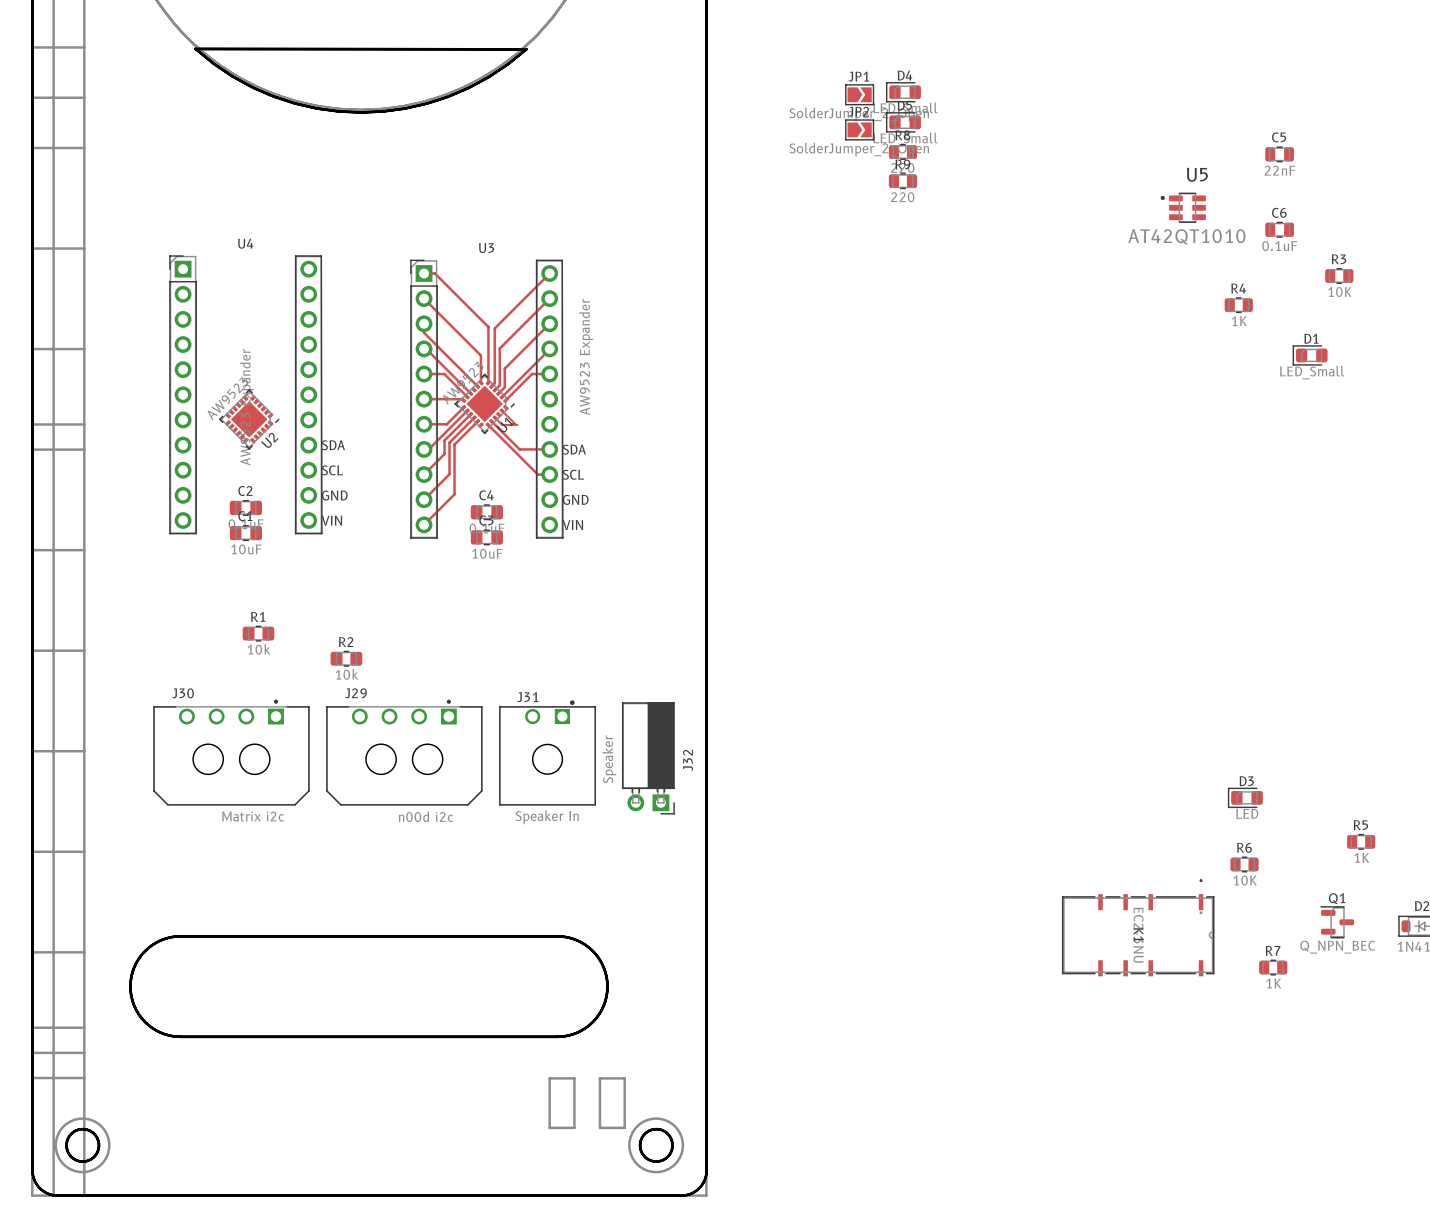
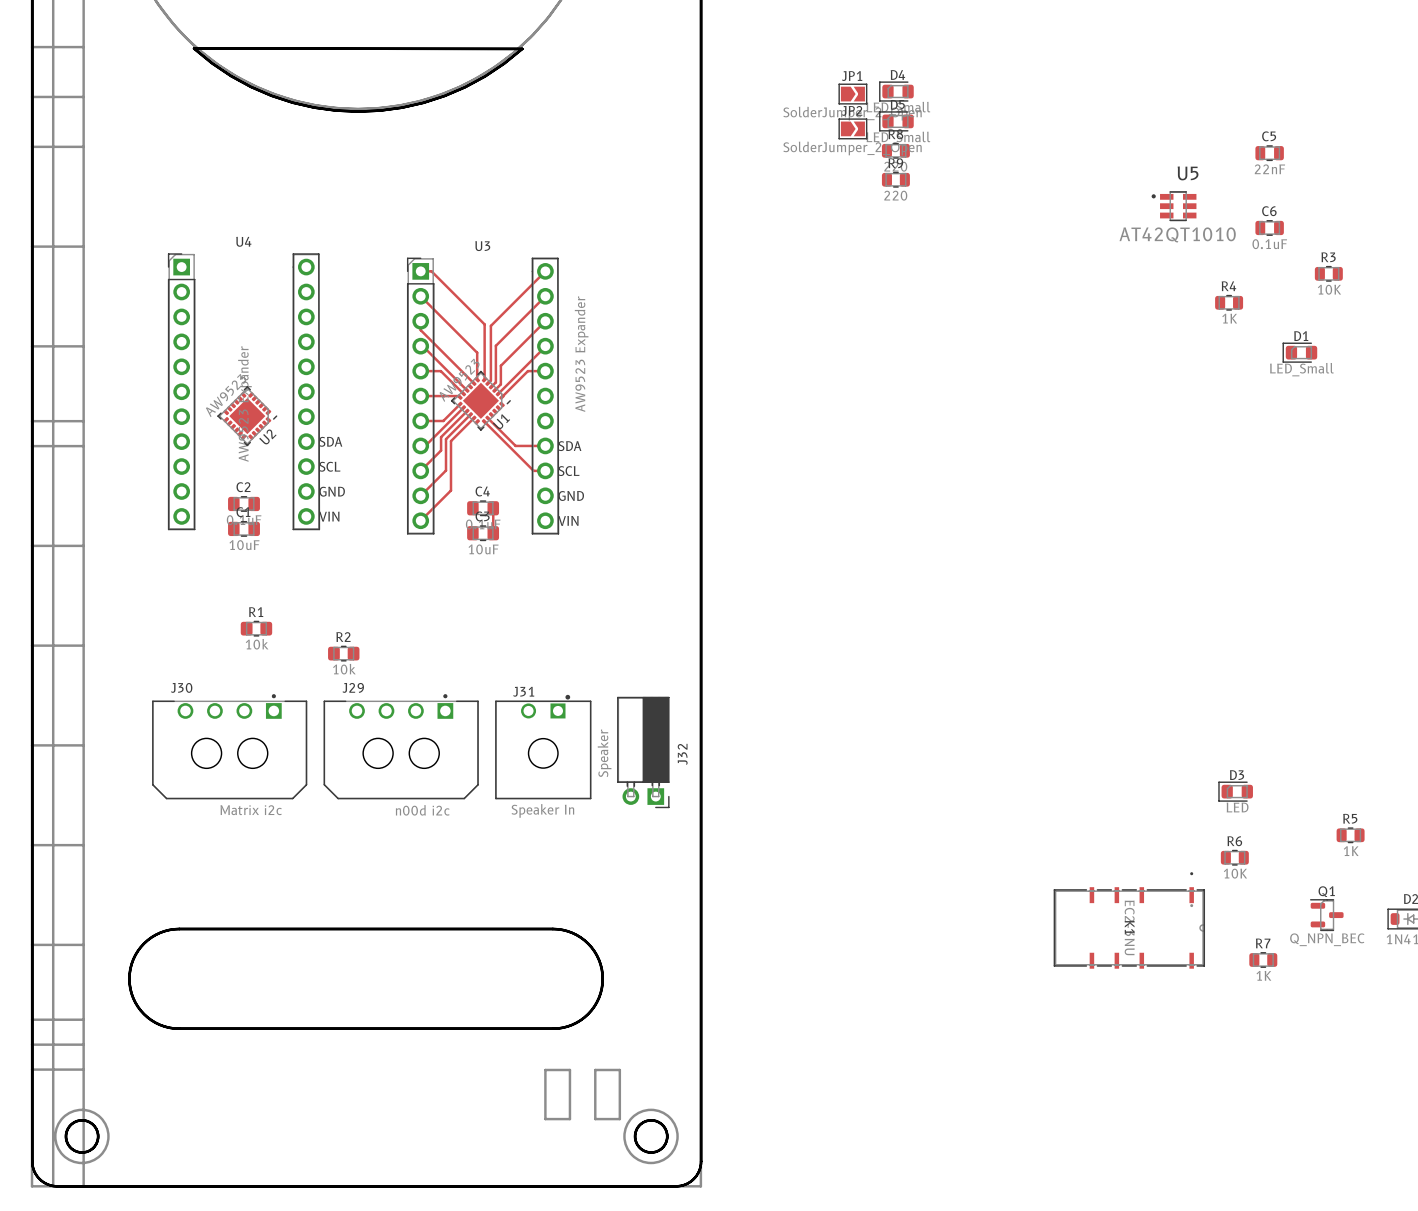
track: (502, 411) (516, 424) -> none
track: (495, 418) (502, 424) (517, 424) -> none
track: none -> (493, 508) (493, 533)

